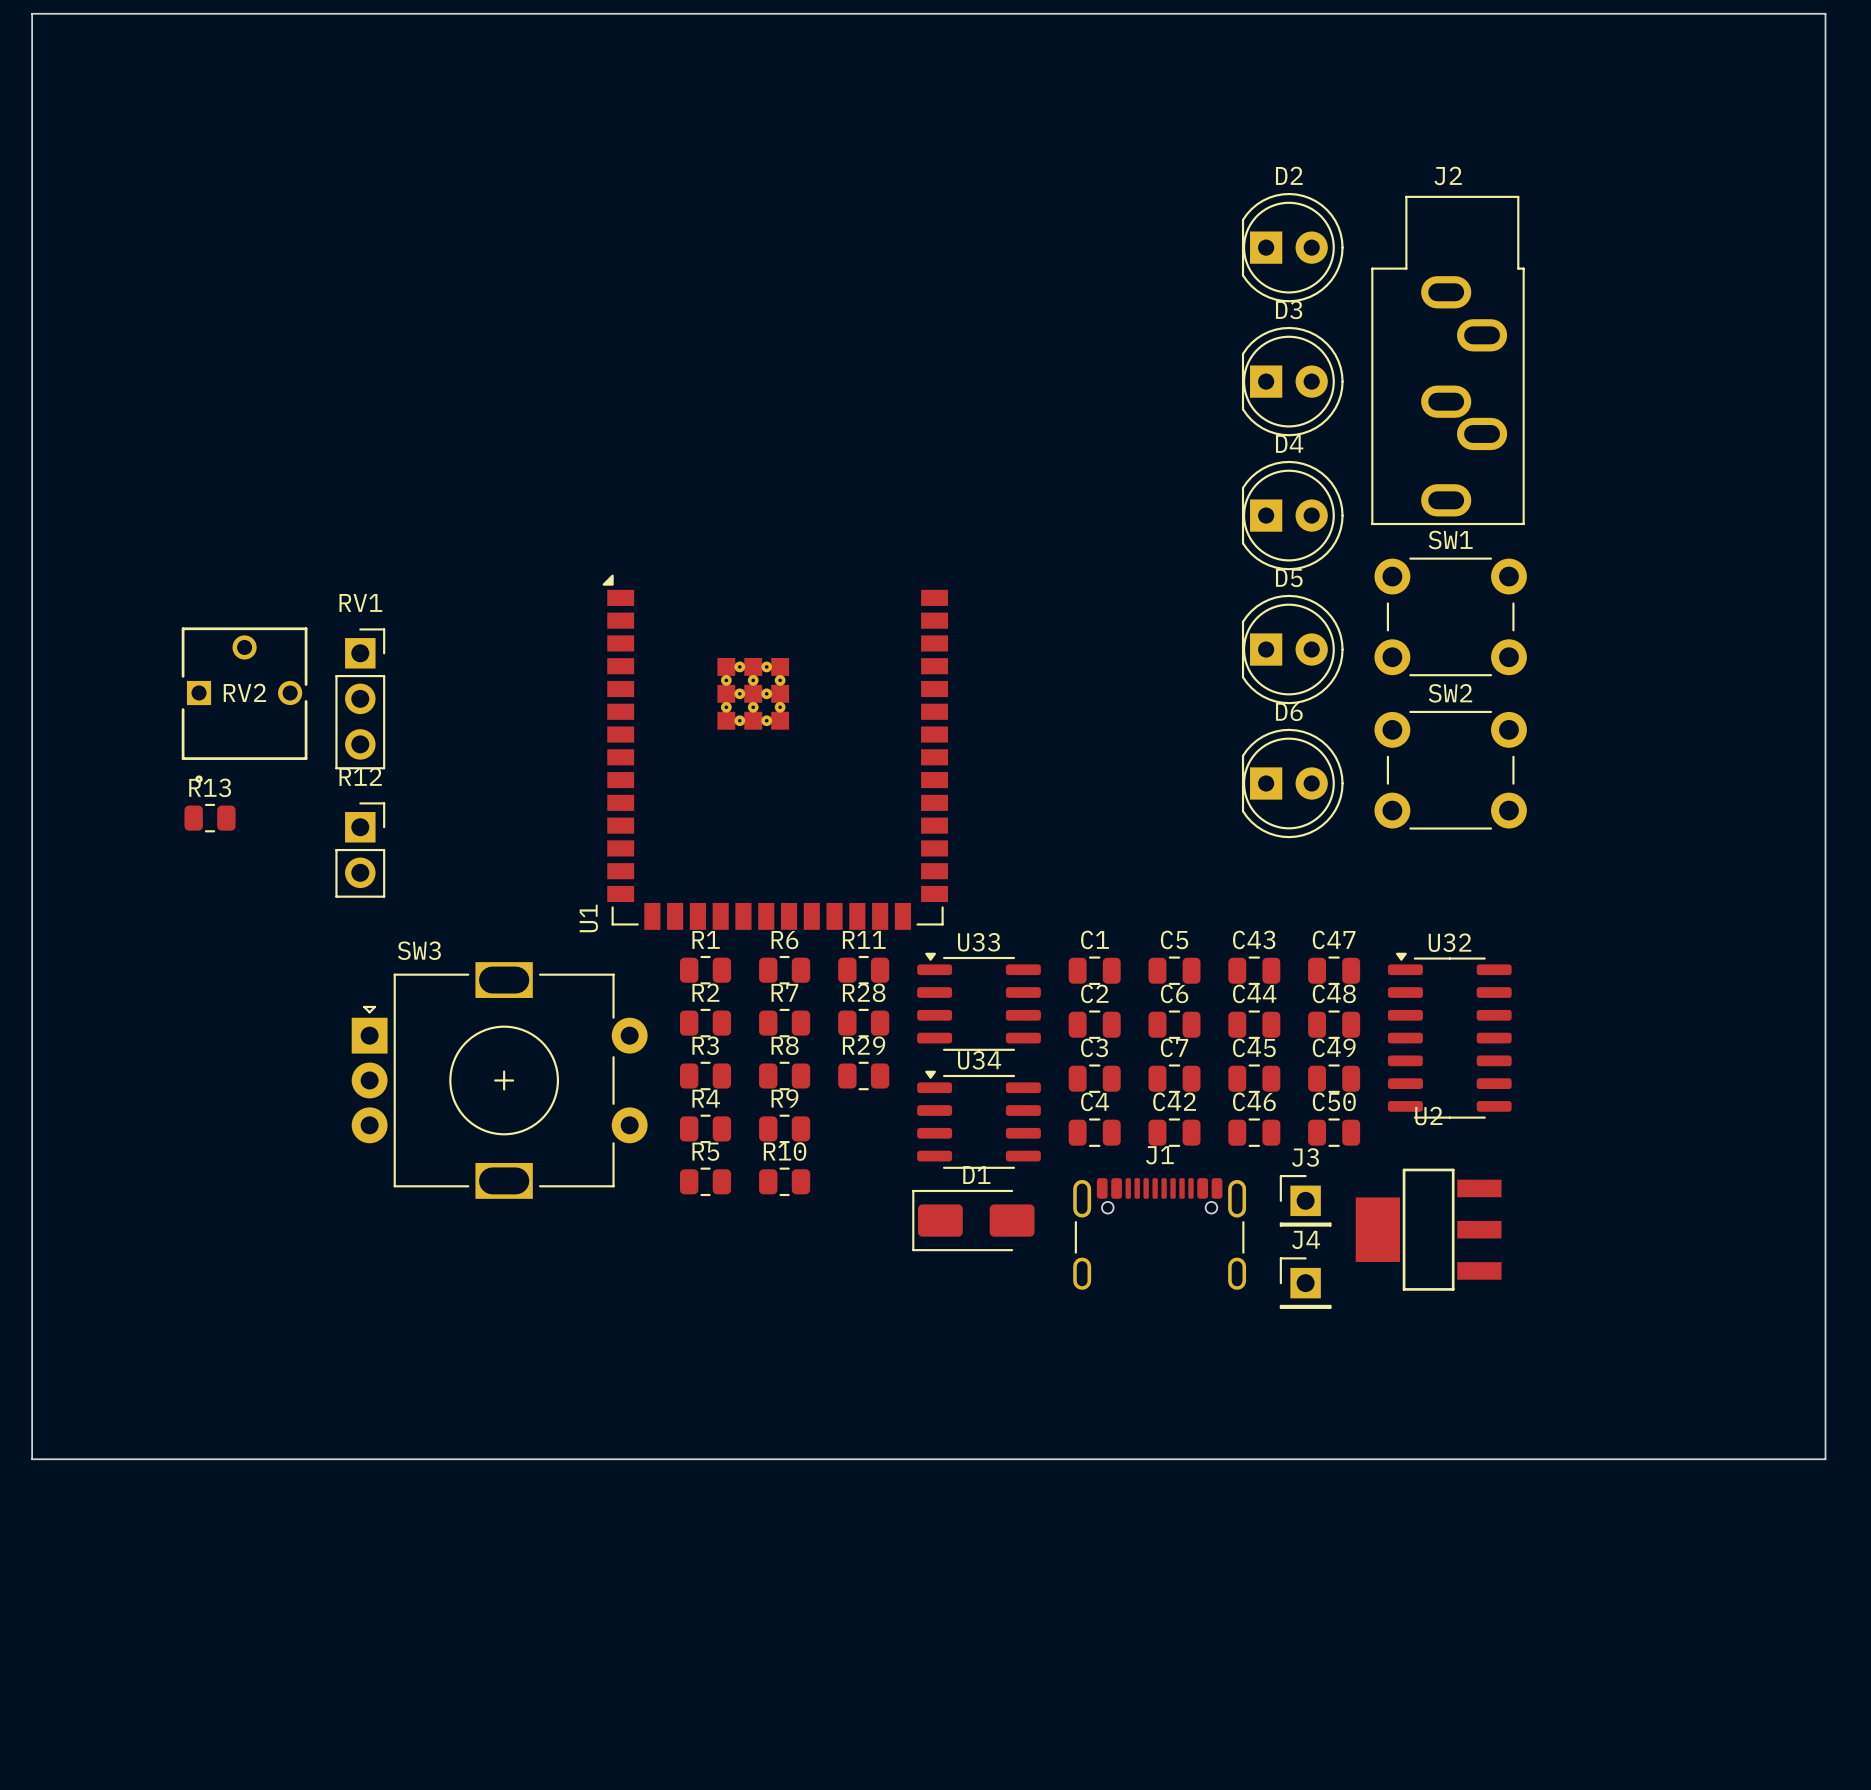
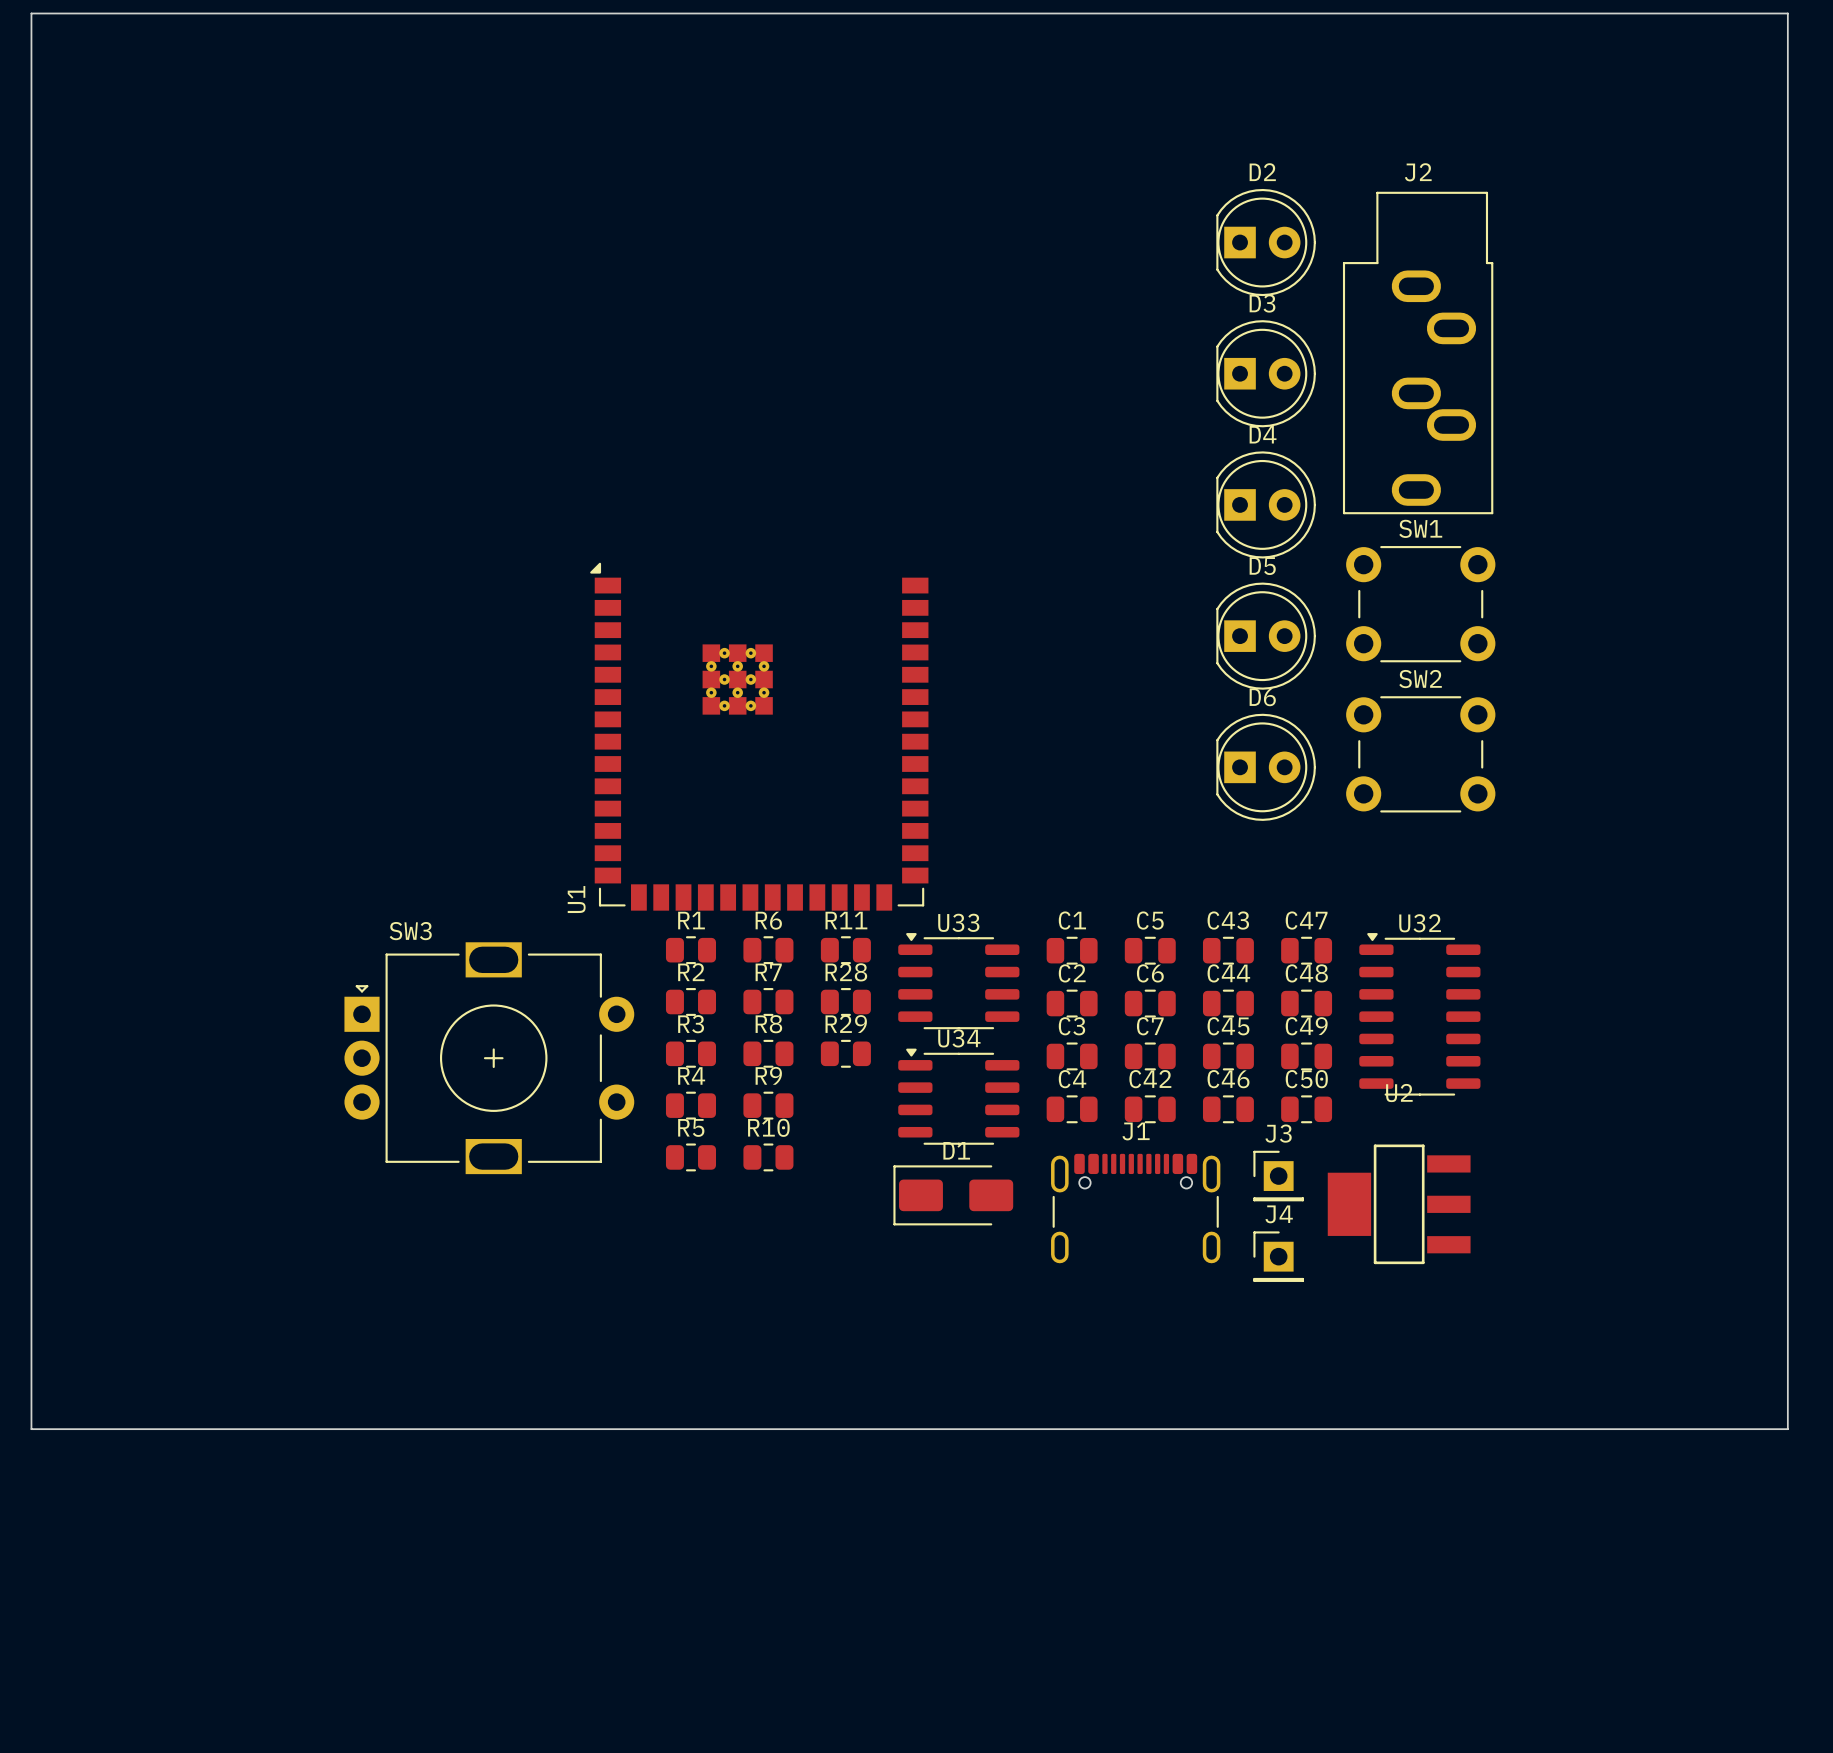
RV1: (360, 698) -> none
RV2: (244, 705) -> none
R13: (210, 818) -> none
R12: (360, 850) -> none

